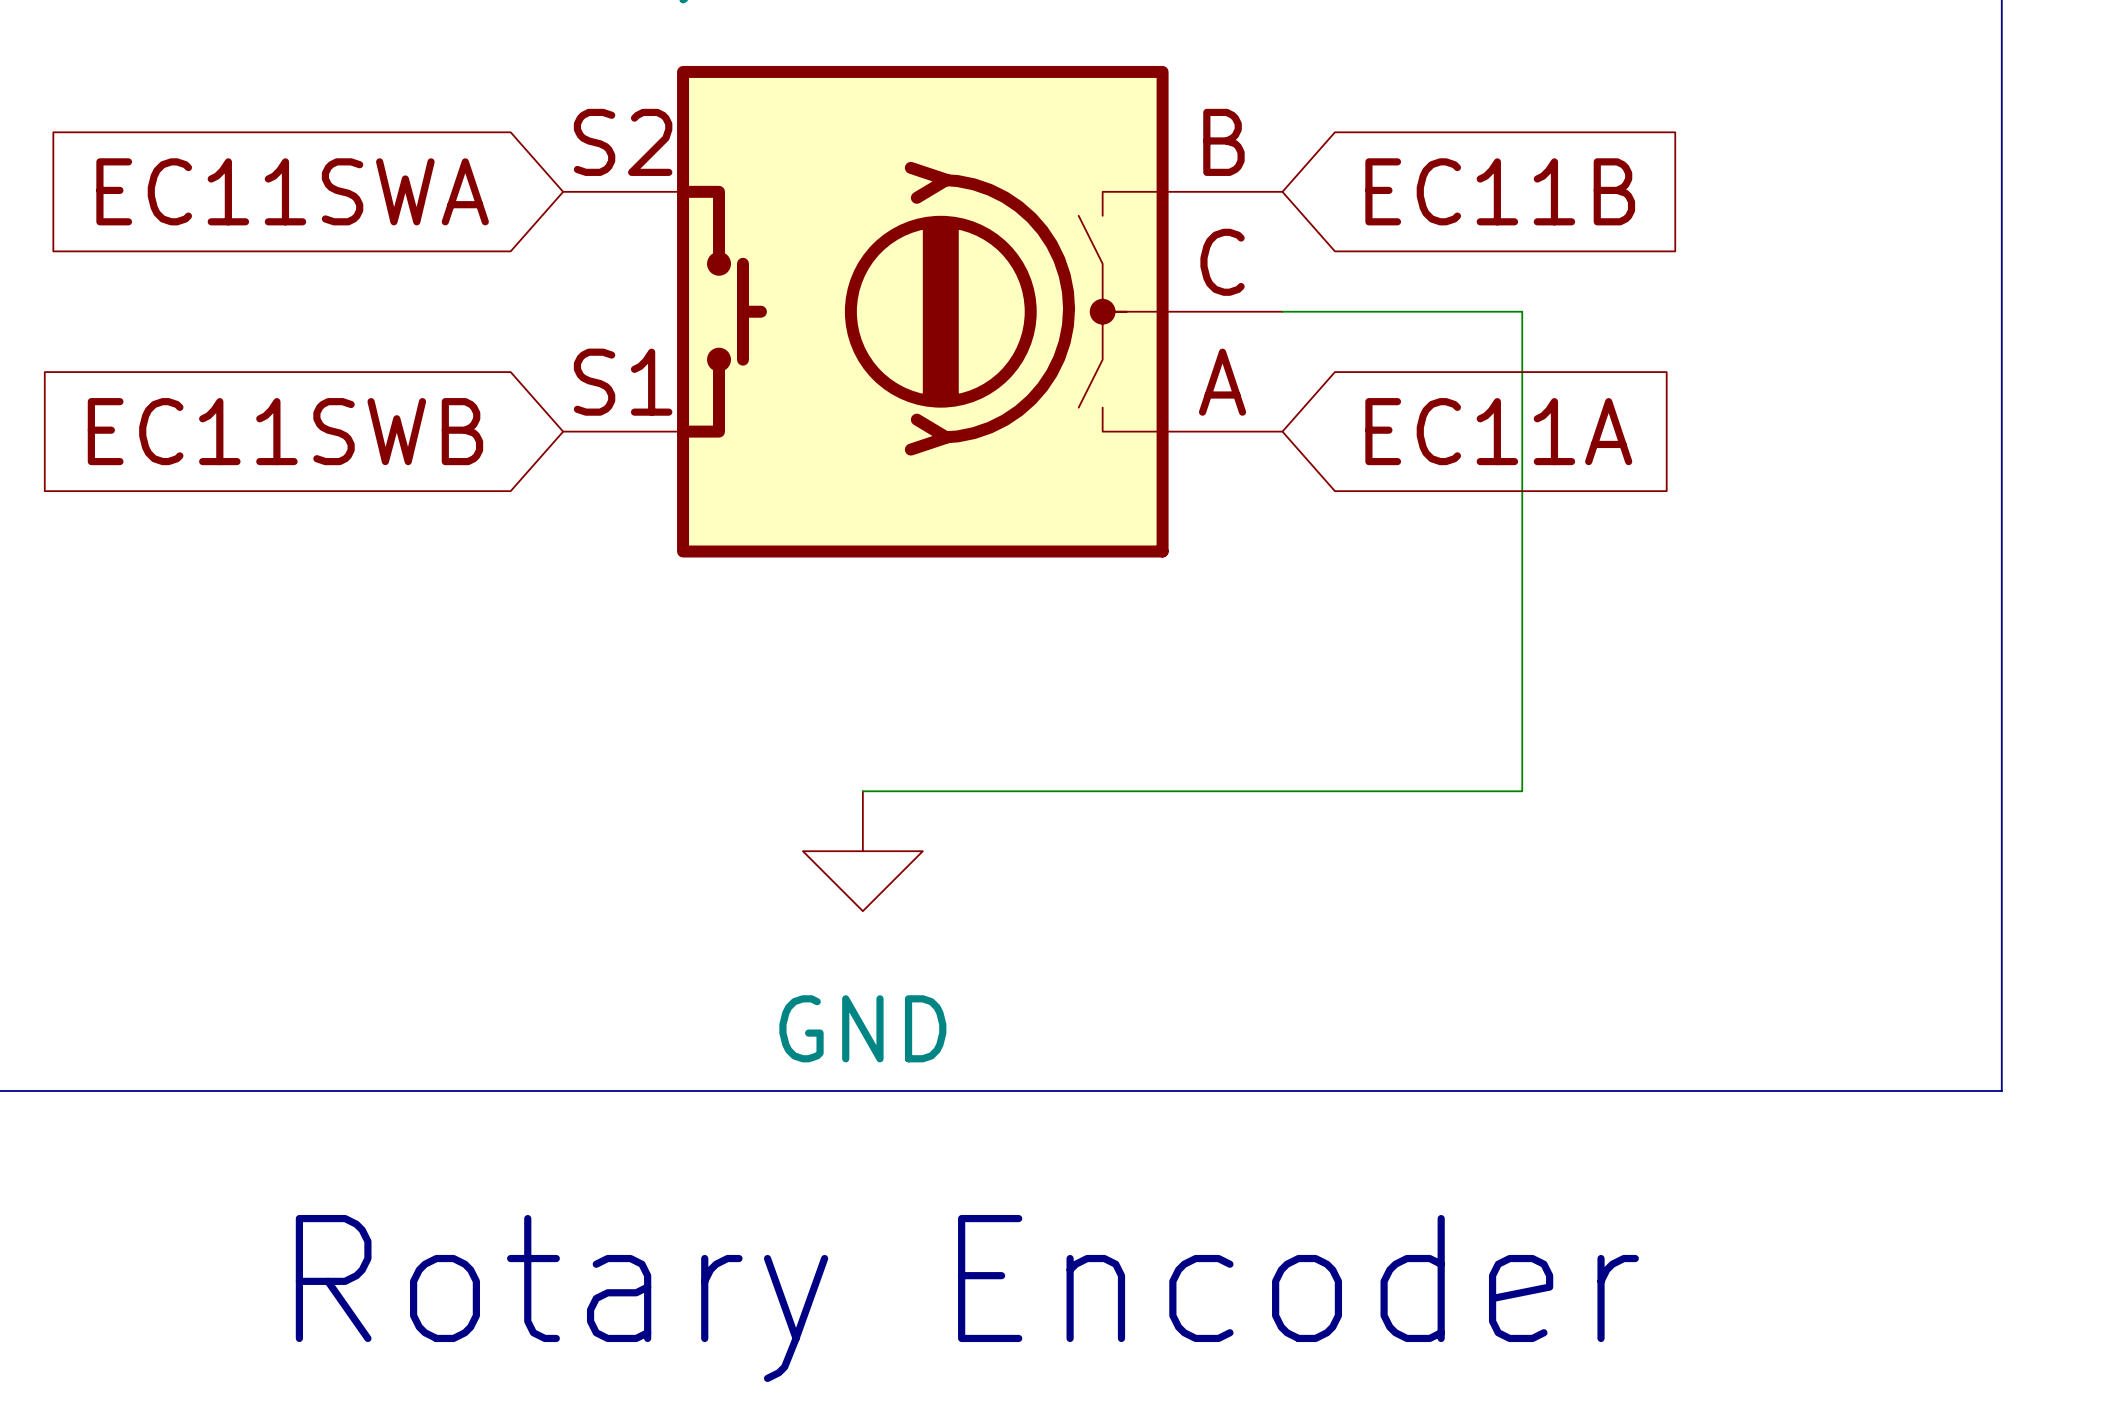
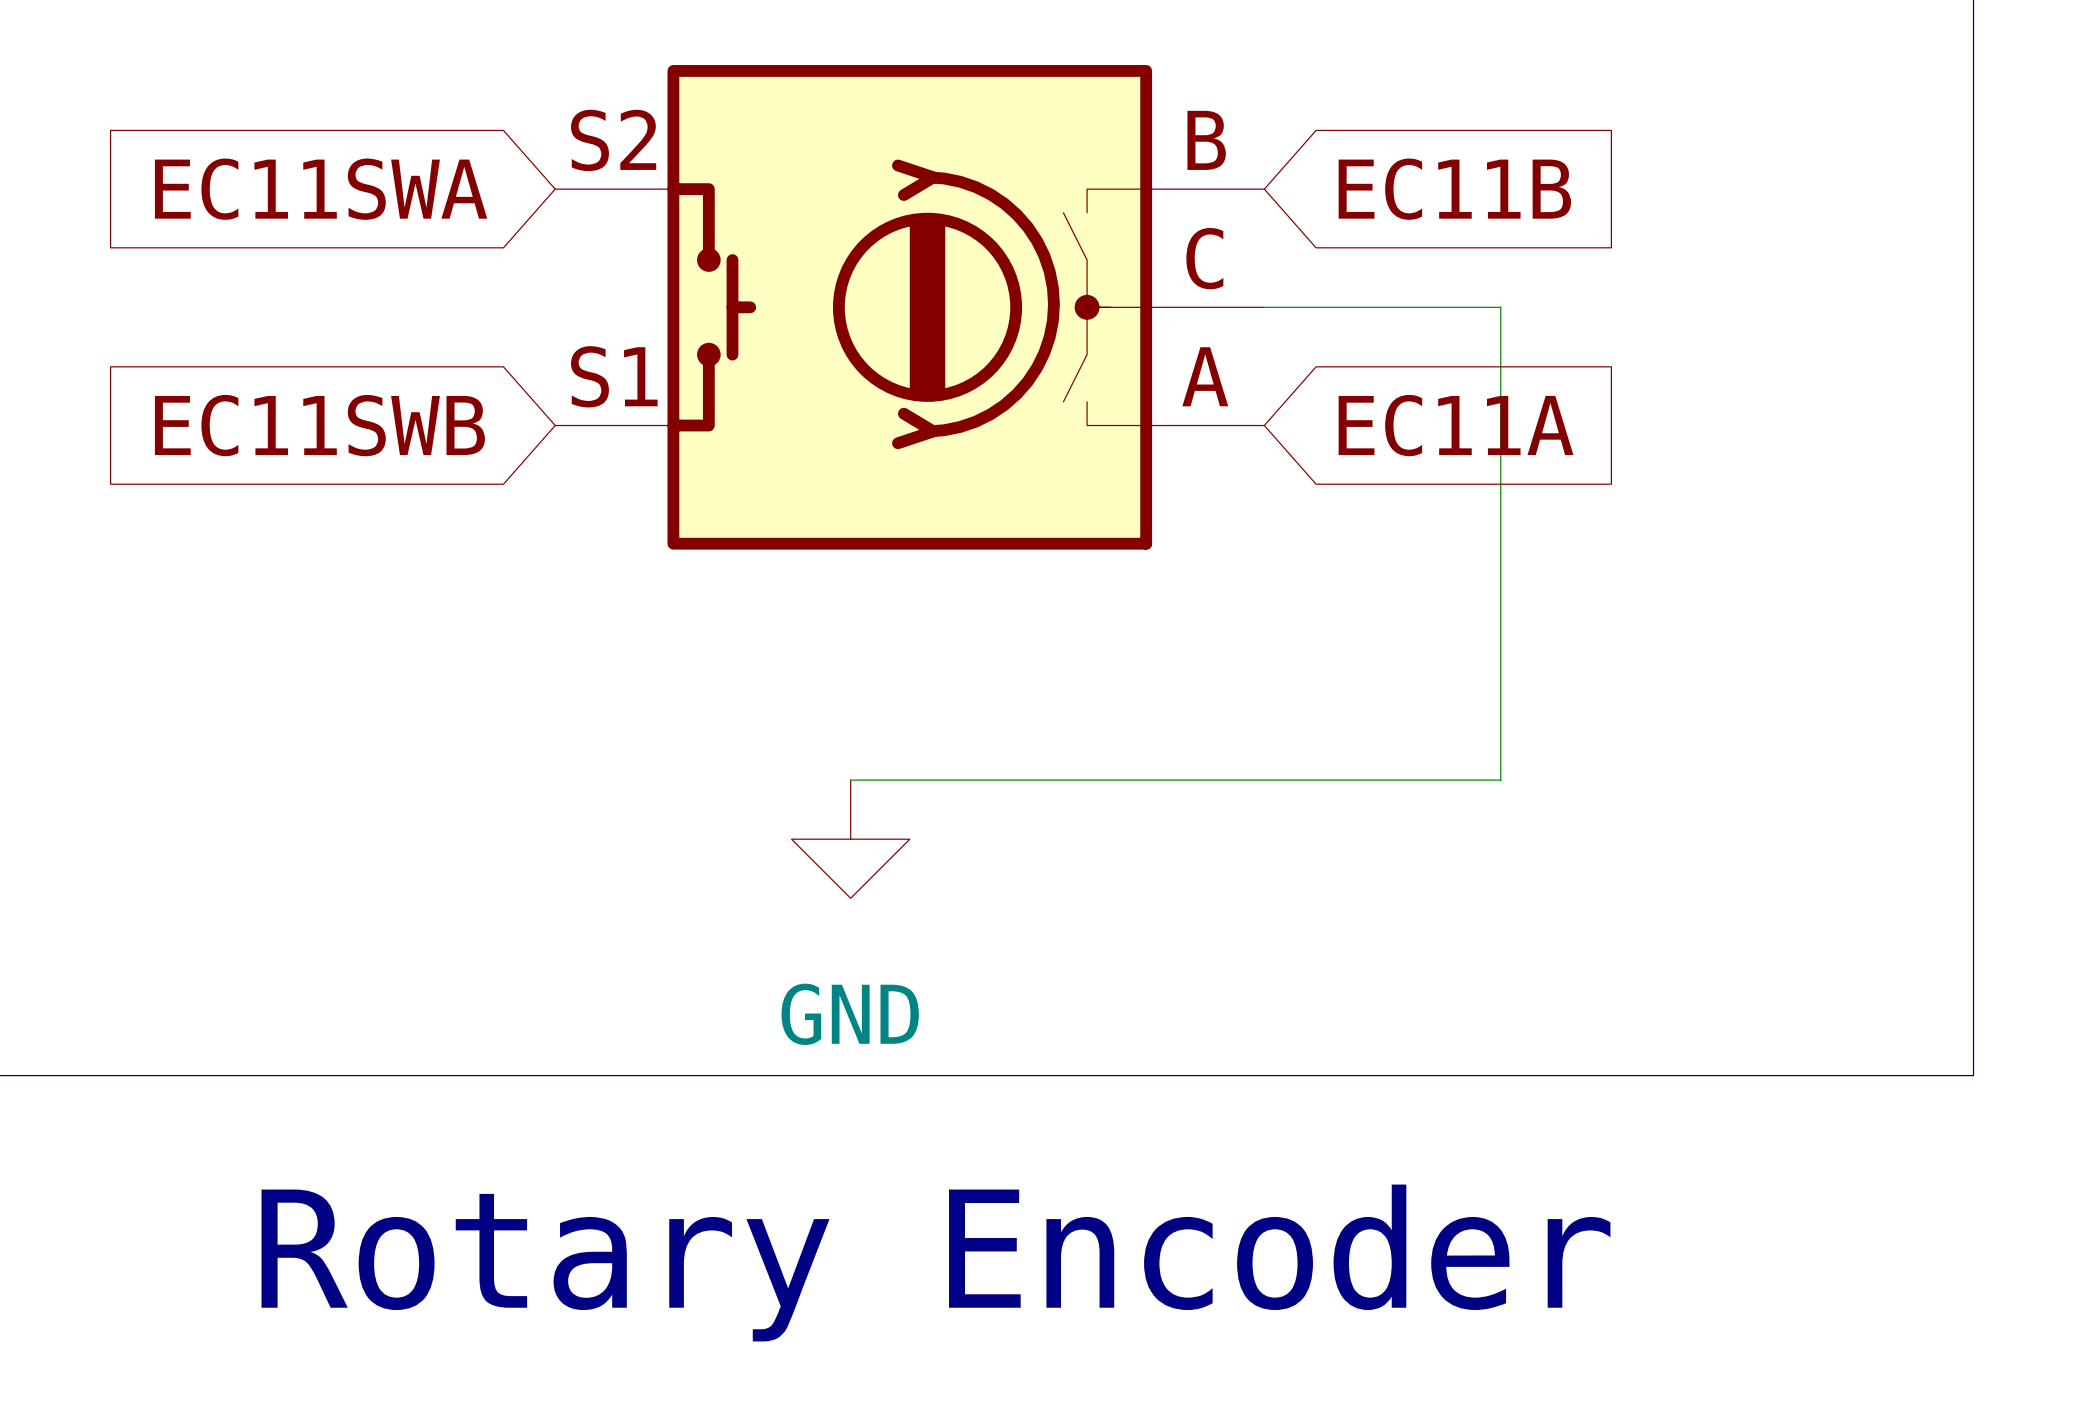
text position: Rotary Encoder (967, 1298) -> Rotary Encoder (935, 1263)

